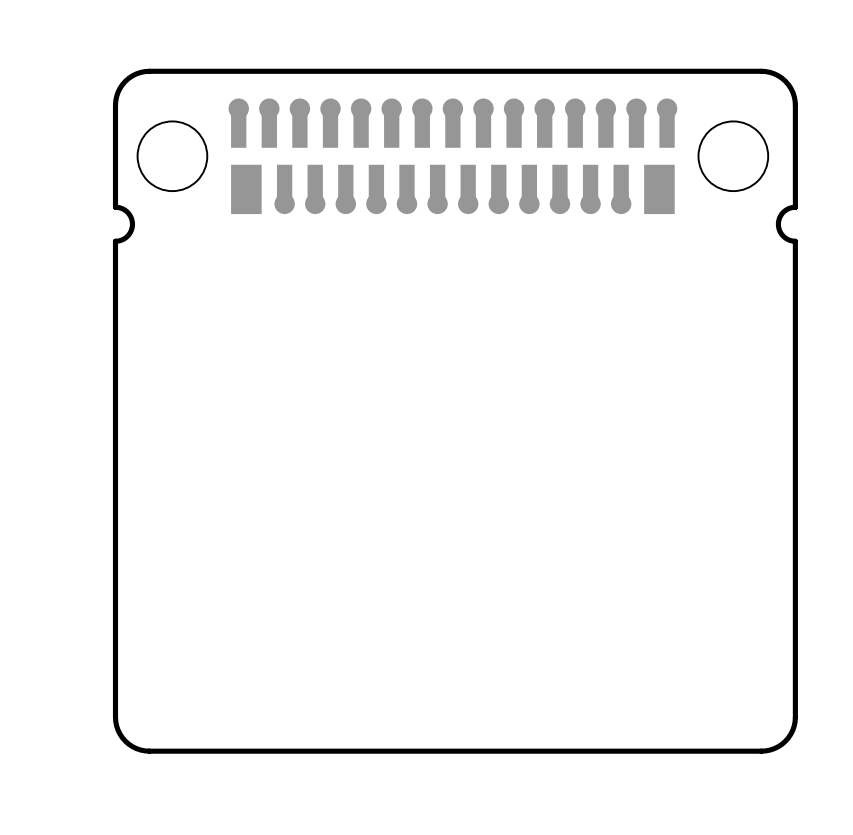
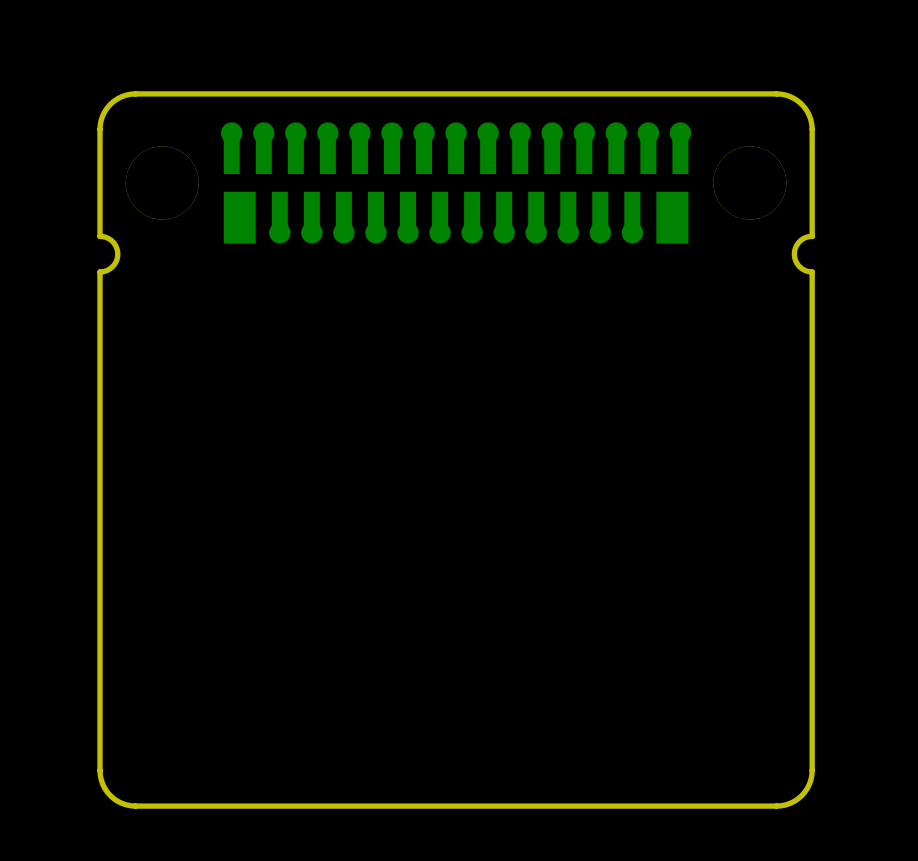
part footprint: [137, 98, 769, 215] -> [125, 122, 787, 244]

